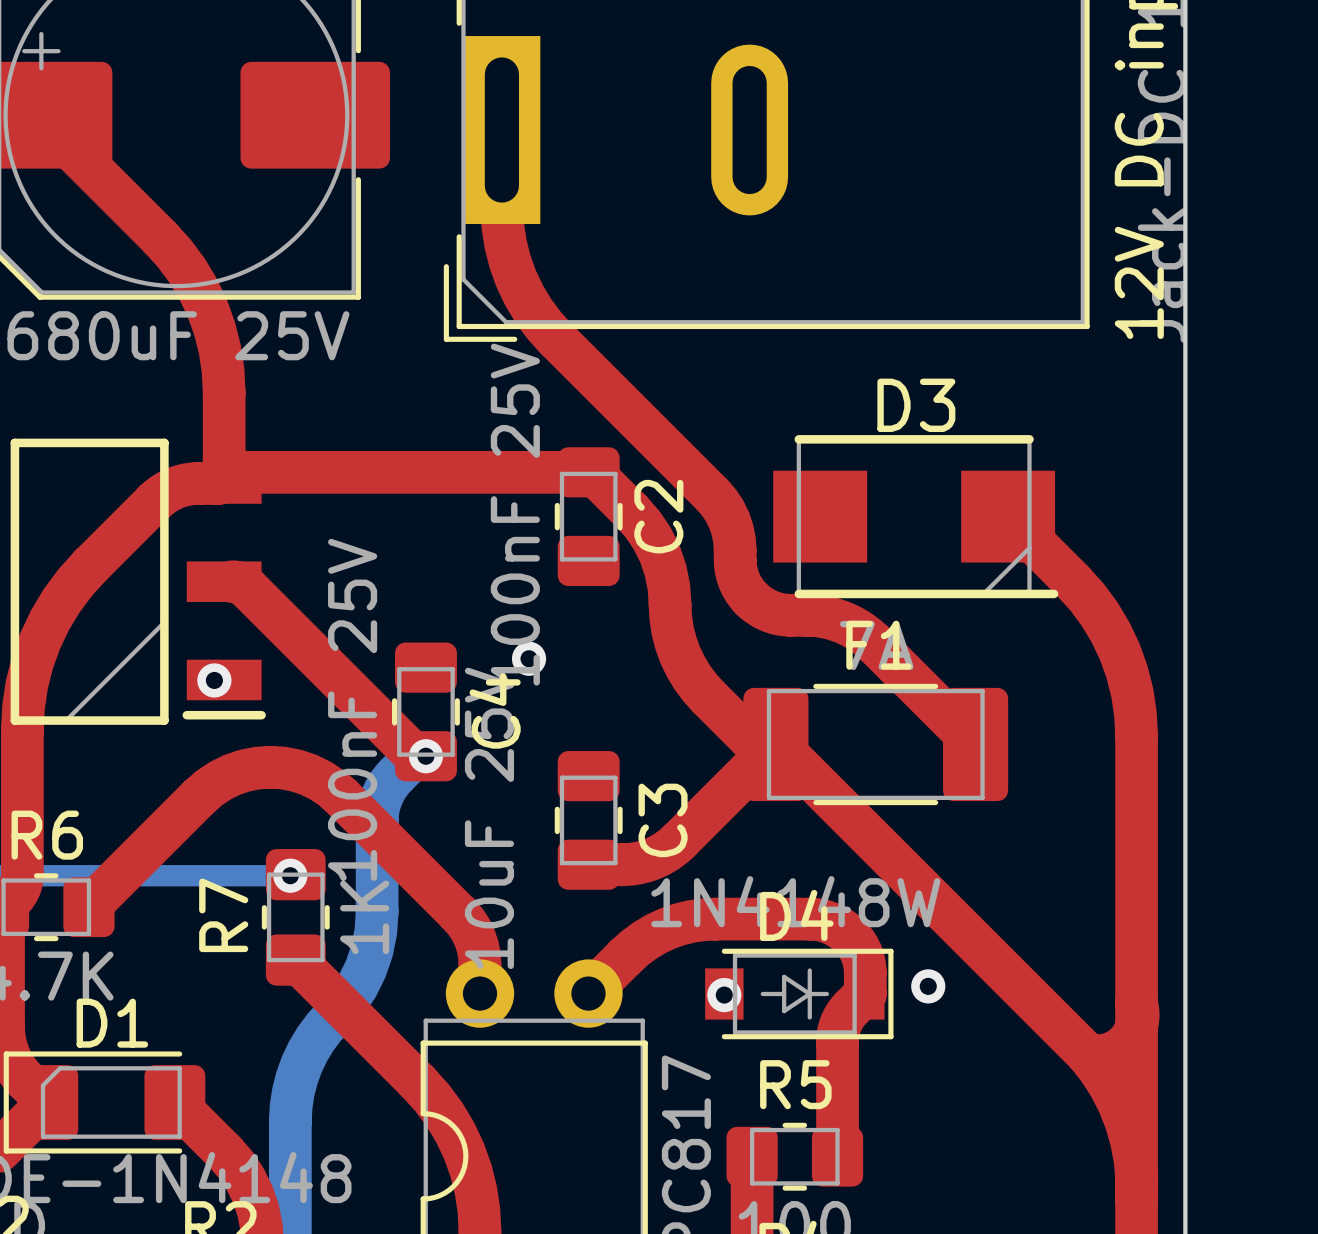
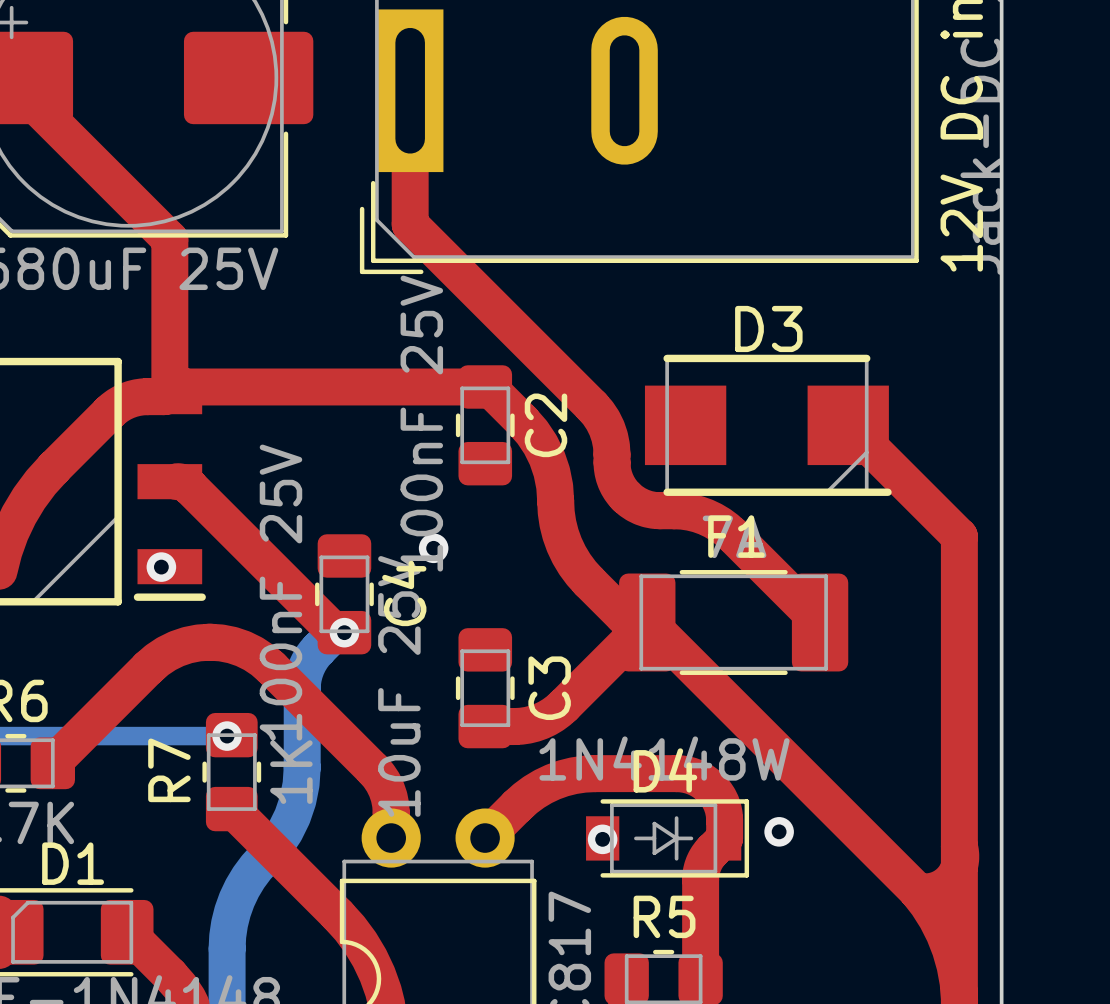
top track: (501, 207) (505, 243) (516, 278) (533, 310) (556, 339) -> (410, 157) (410, 224) (457, 271)
top track: (159, 237) (187, 270) (207, 308) (219, 349) (224, 392) -> (114, 183) (169, 239) (169, 318)
top track: (1072, 580) (1099, 614) (1119, 651) (1132, 693) (1136, 735) -> (903, 480) (959, 536) (959, 615)

